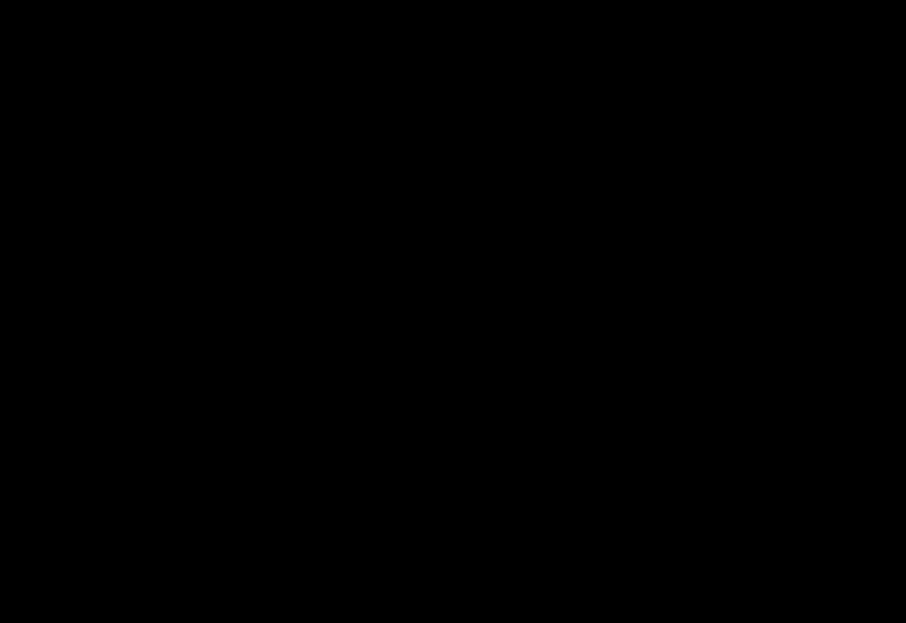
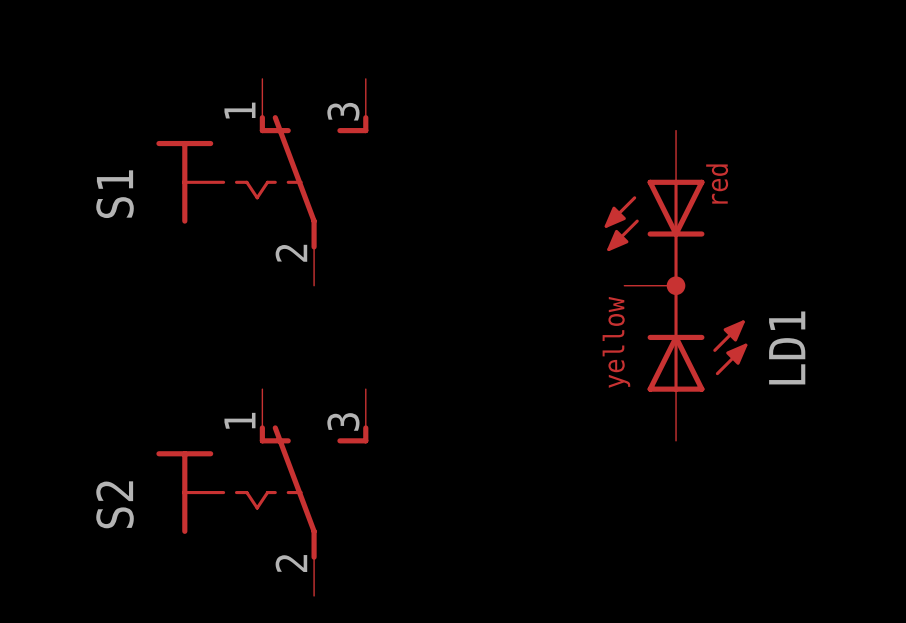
S1: none -> (262, 182)
LD1: none -> (676, 285)
S2: none -> (262, 492)

